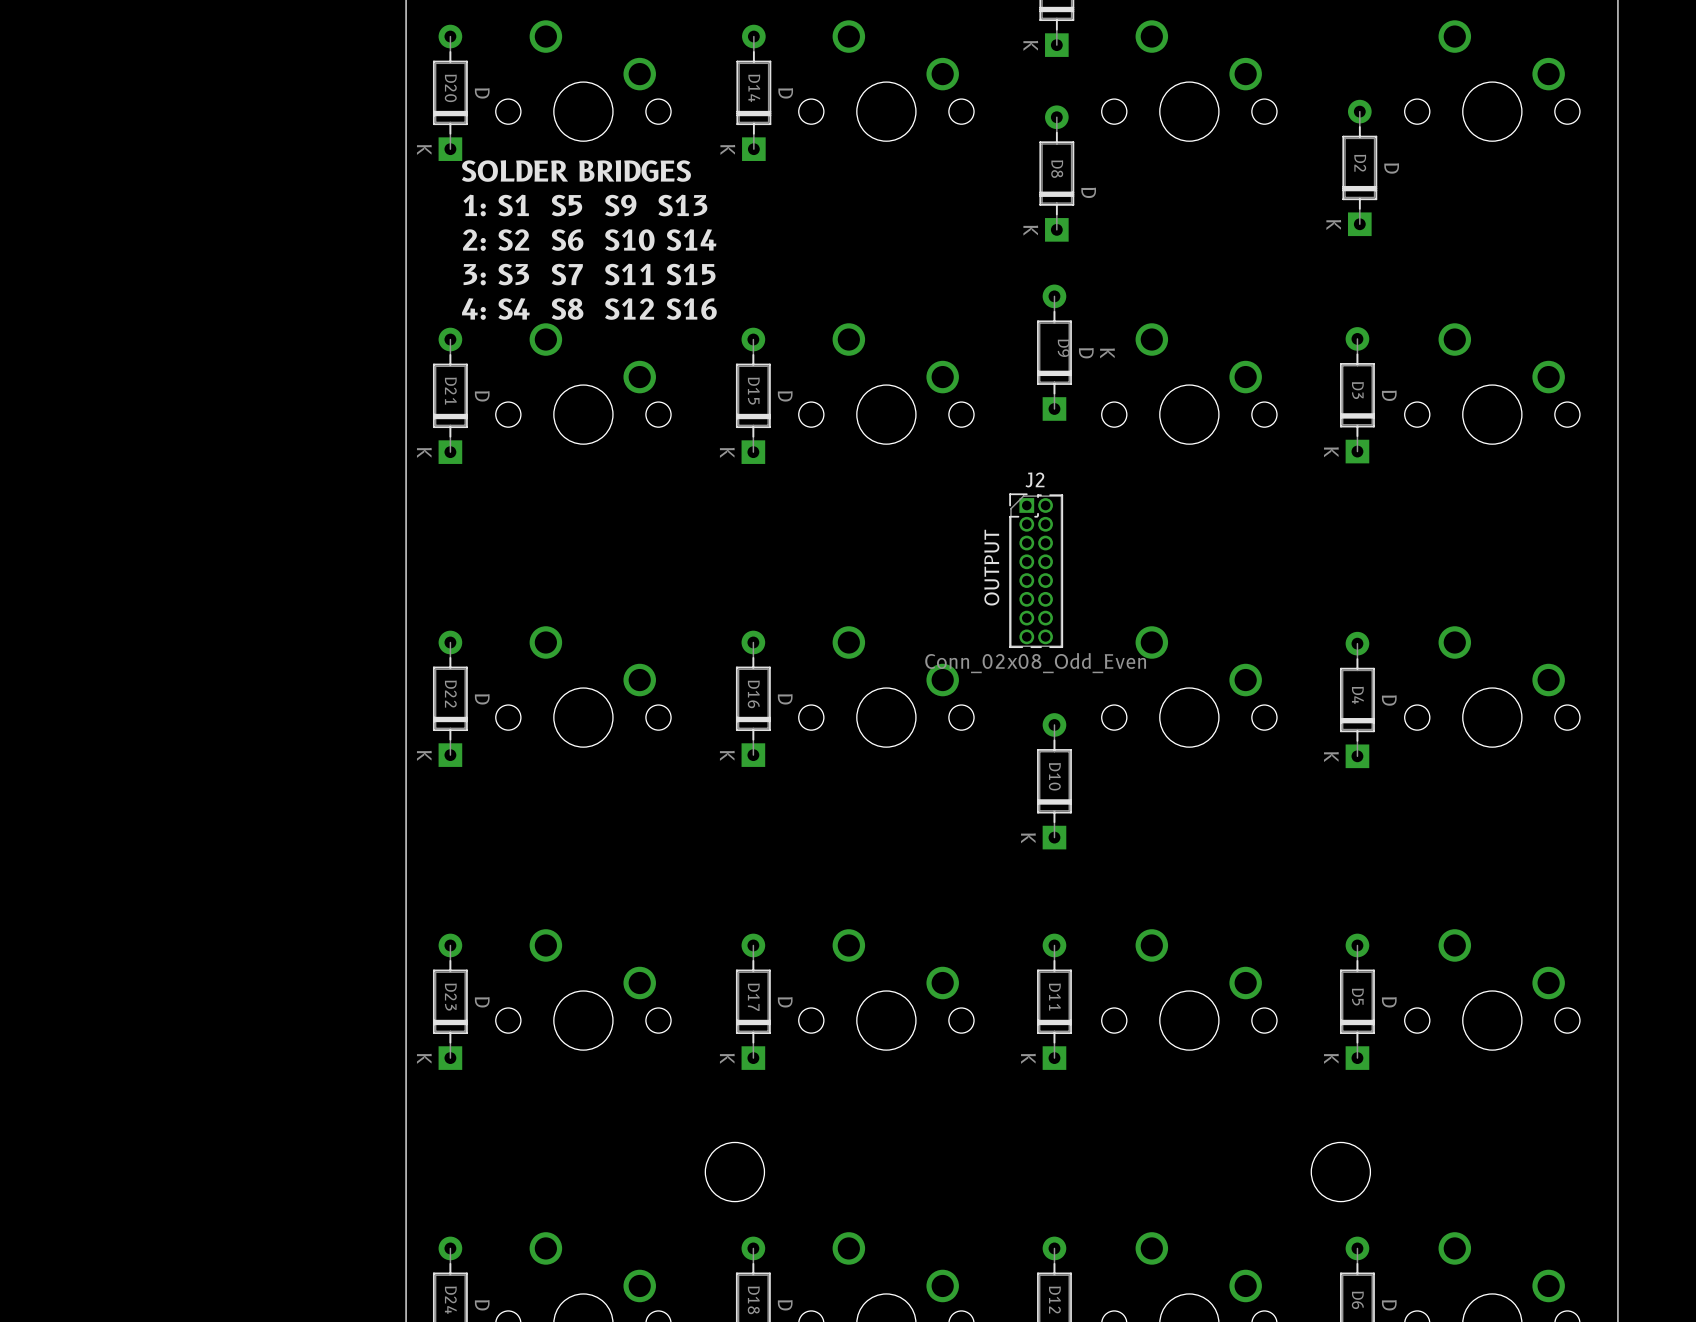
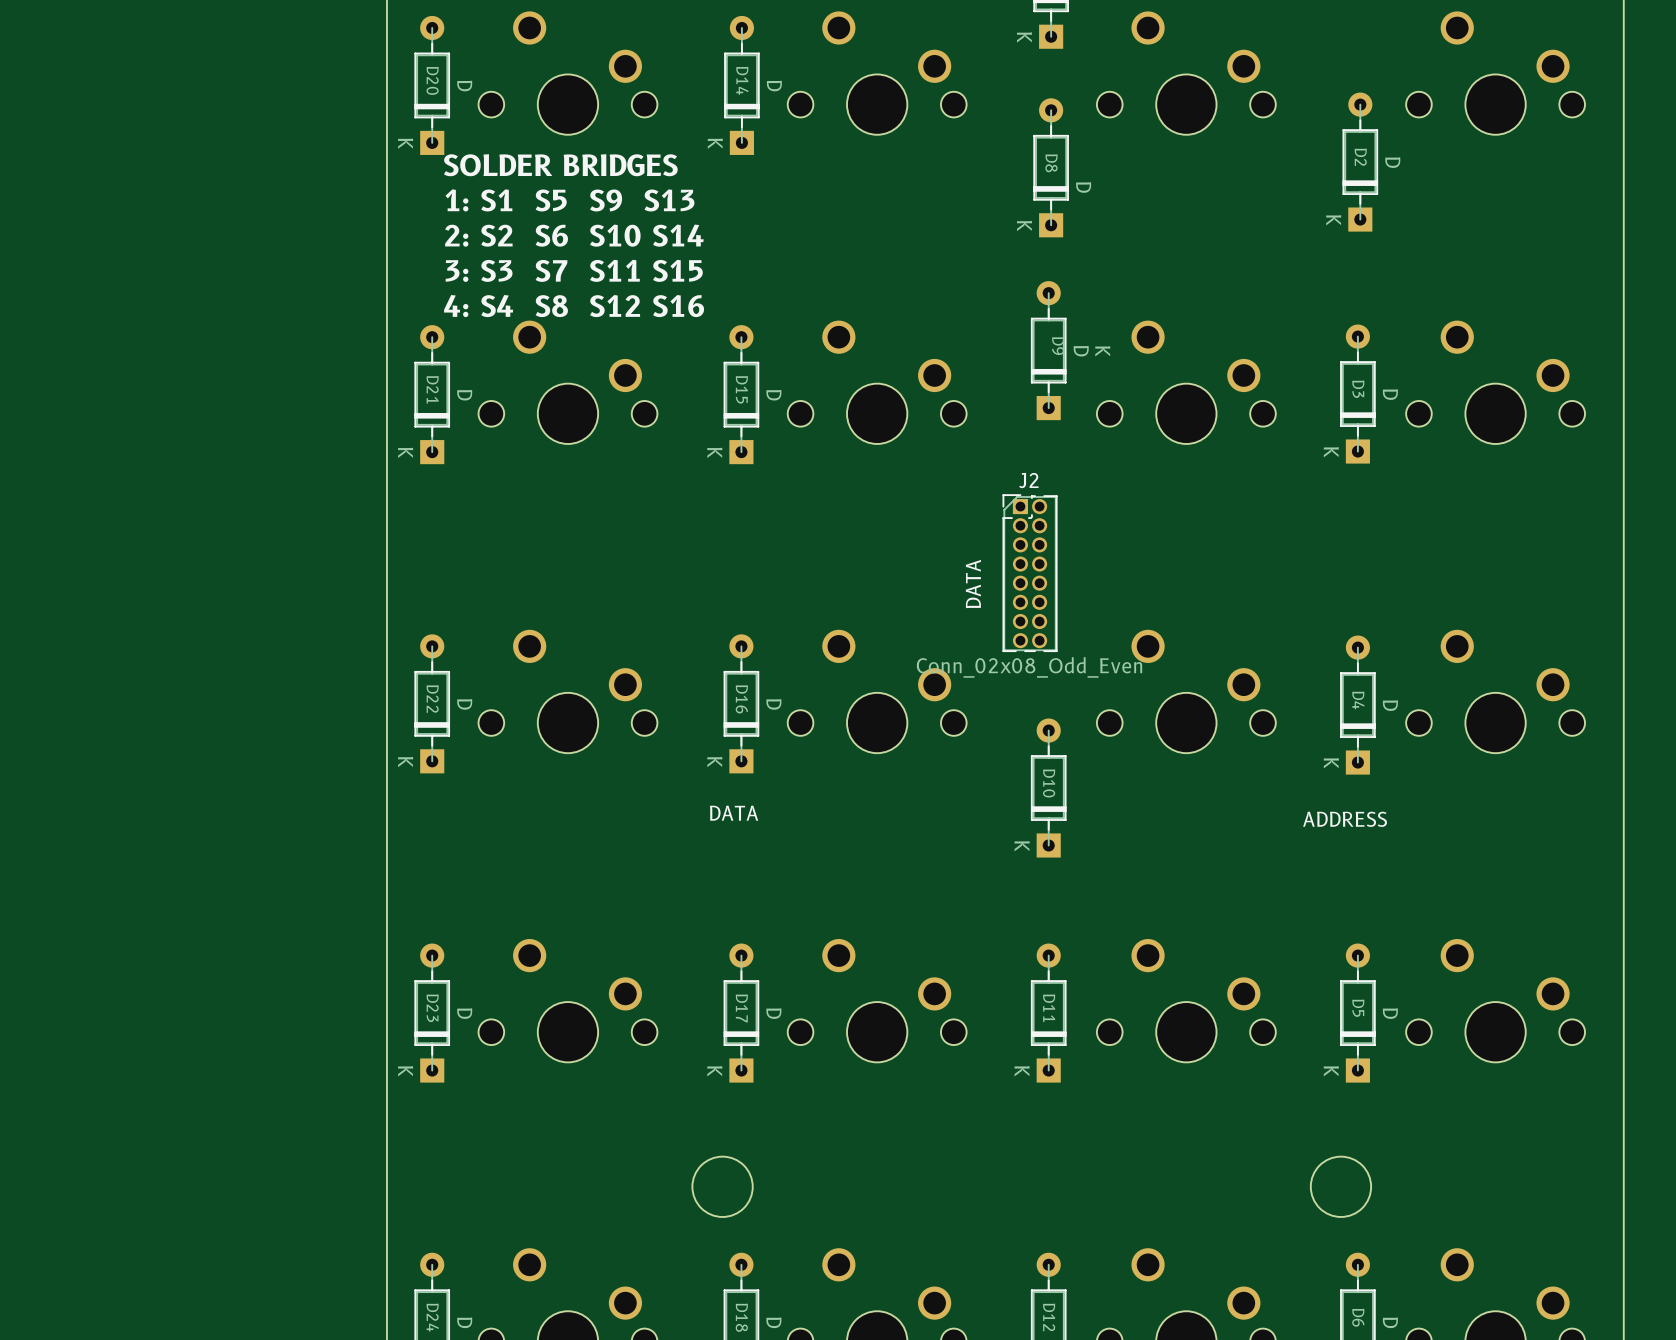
text: OUTPUT (991, 567) -> DATA (973, 584)
text: none -> DATA (734, 813)
text: none -> ADDRESS (1345, 819)

